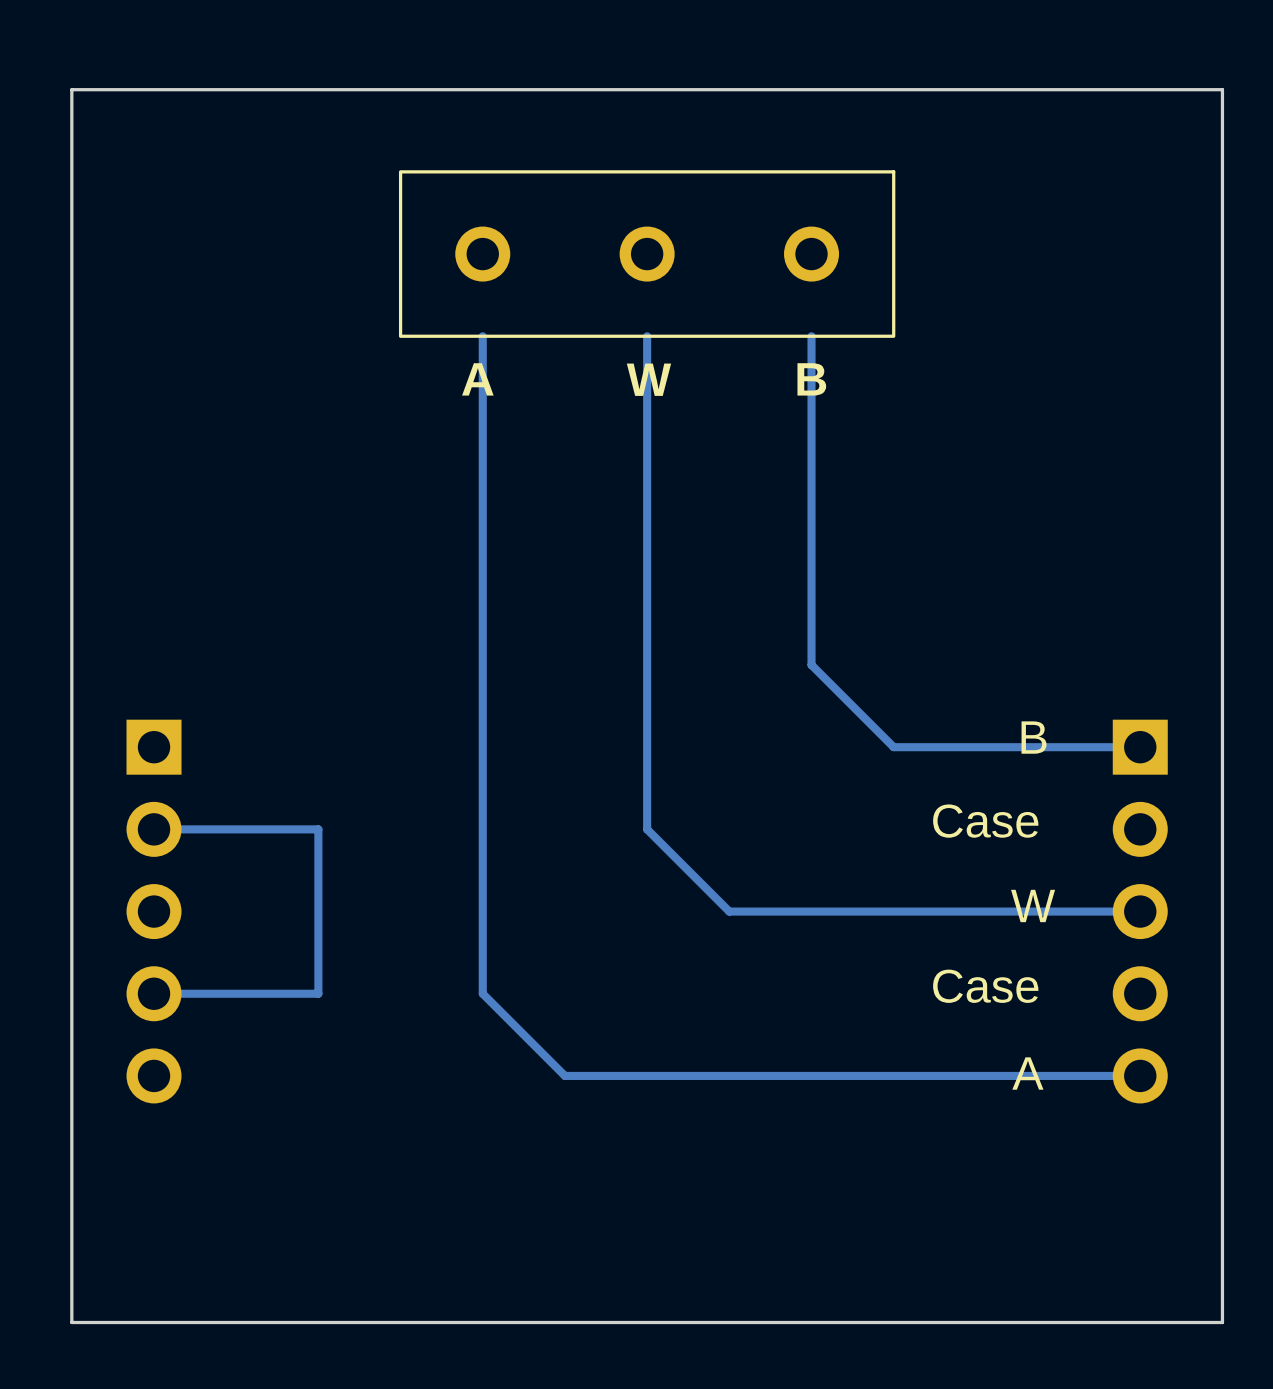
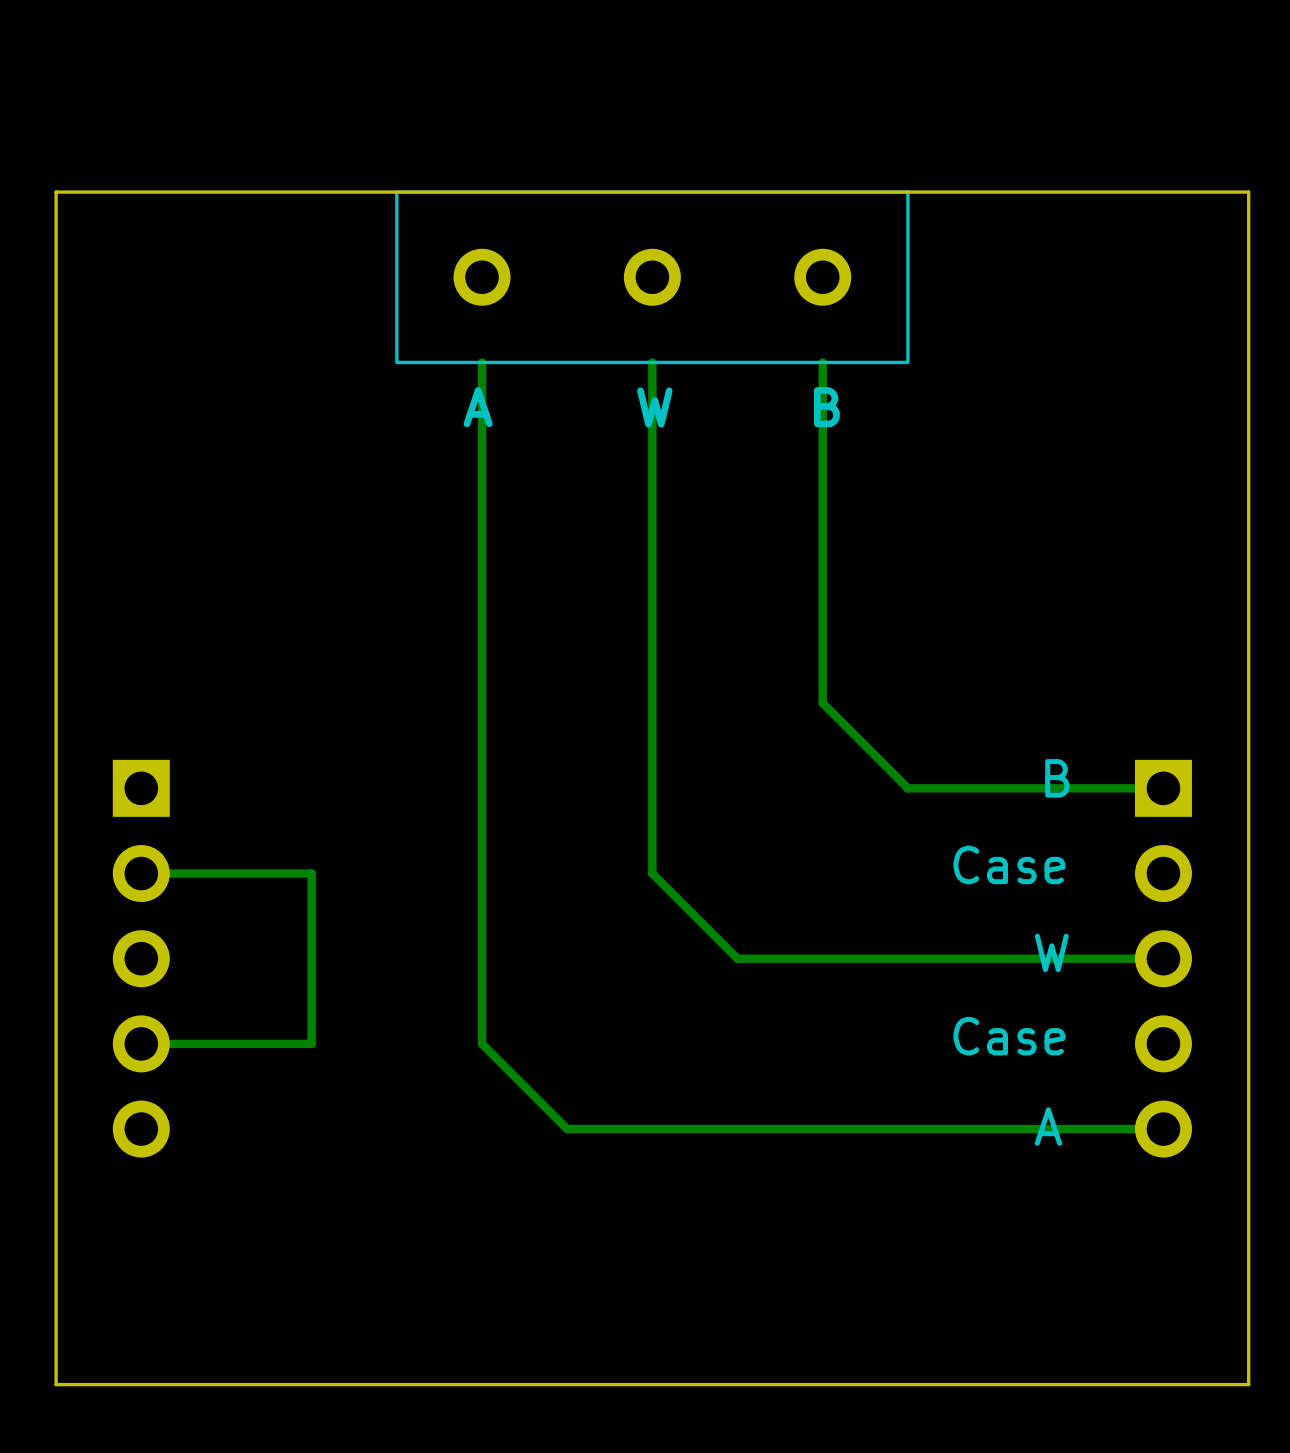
board edge: (1222, 171) (1222, 89) (71, 89) (71, 171) -> (1248, 192) (56, 192)

